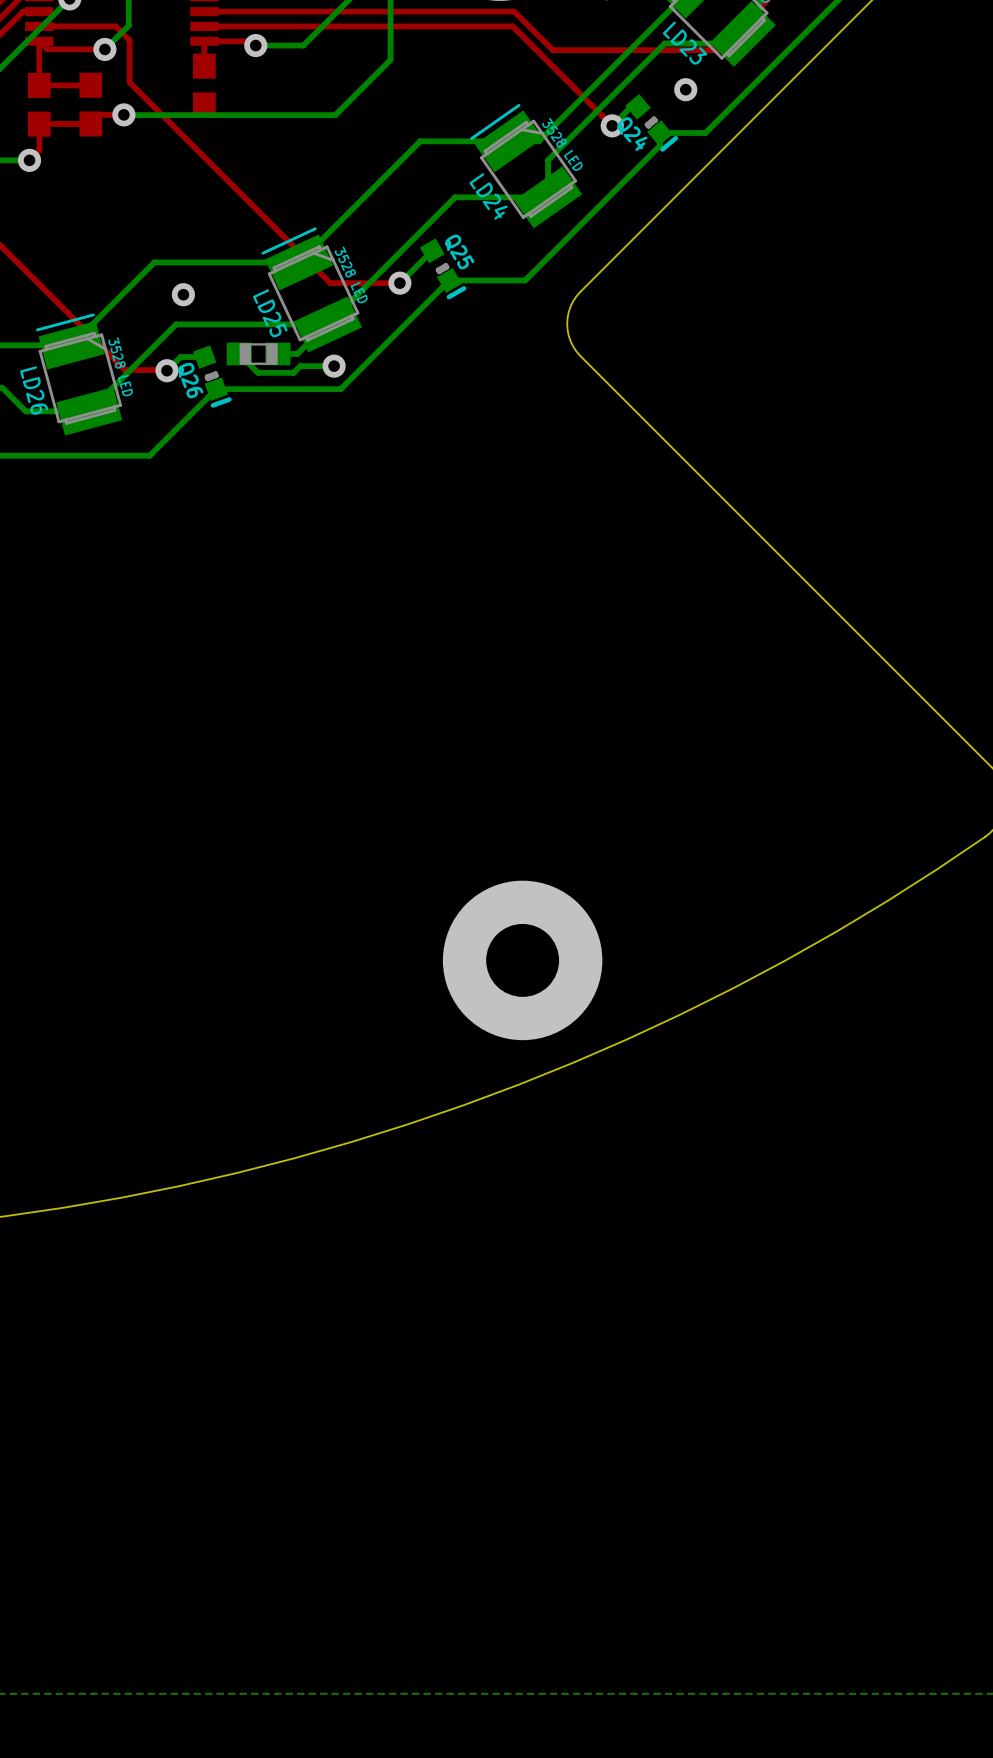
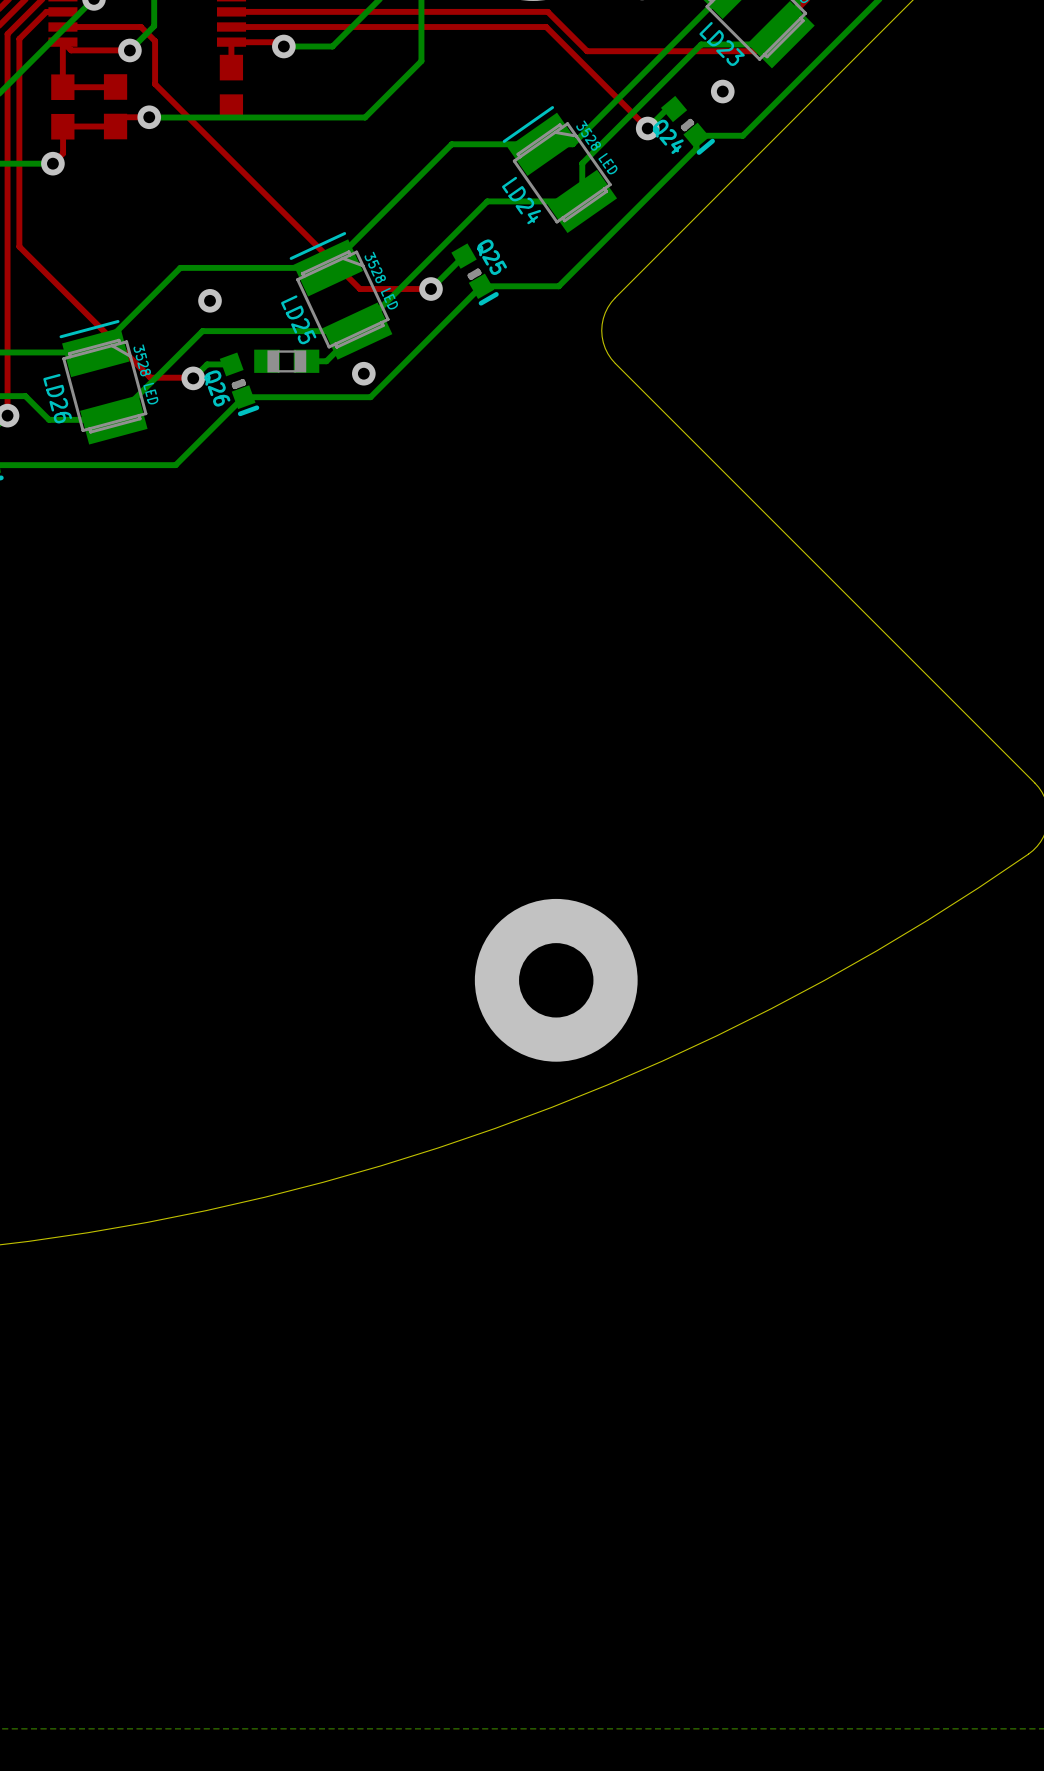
bottom track: (239, 353) (258, 372) (293, 372) (300, 366) (334, 366) -> none

